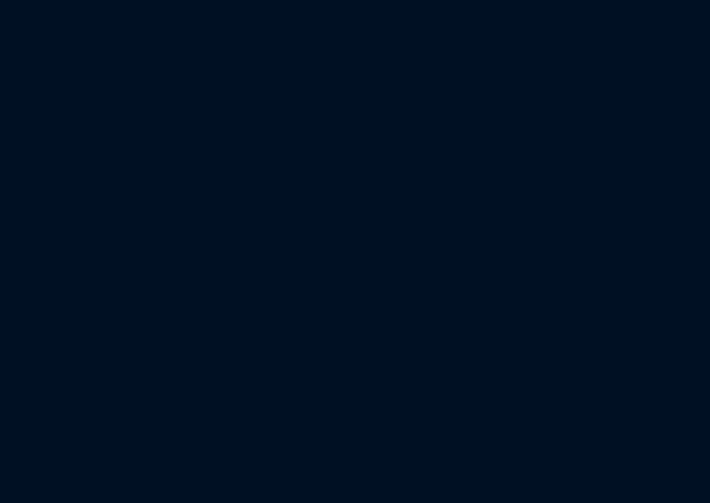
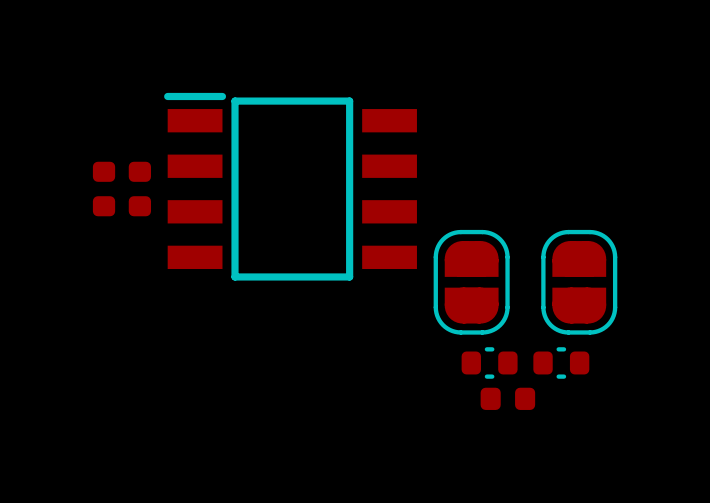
part: none -> (290, 186)
part: none -> (104, 189)
part: none -> (139, 189)
part: none -> (471, 282)
part: none -> (579, 282)
part: none -> (489, 362)
part: none -> (561, 362)
part: none -> (507, 398)

